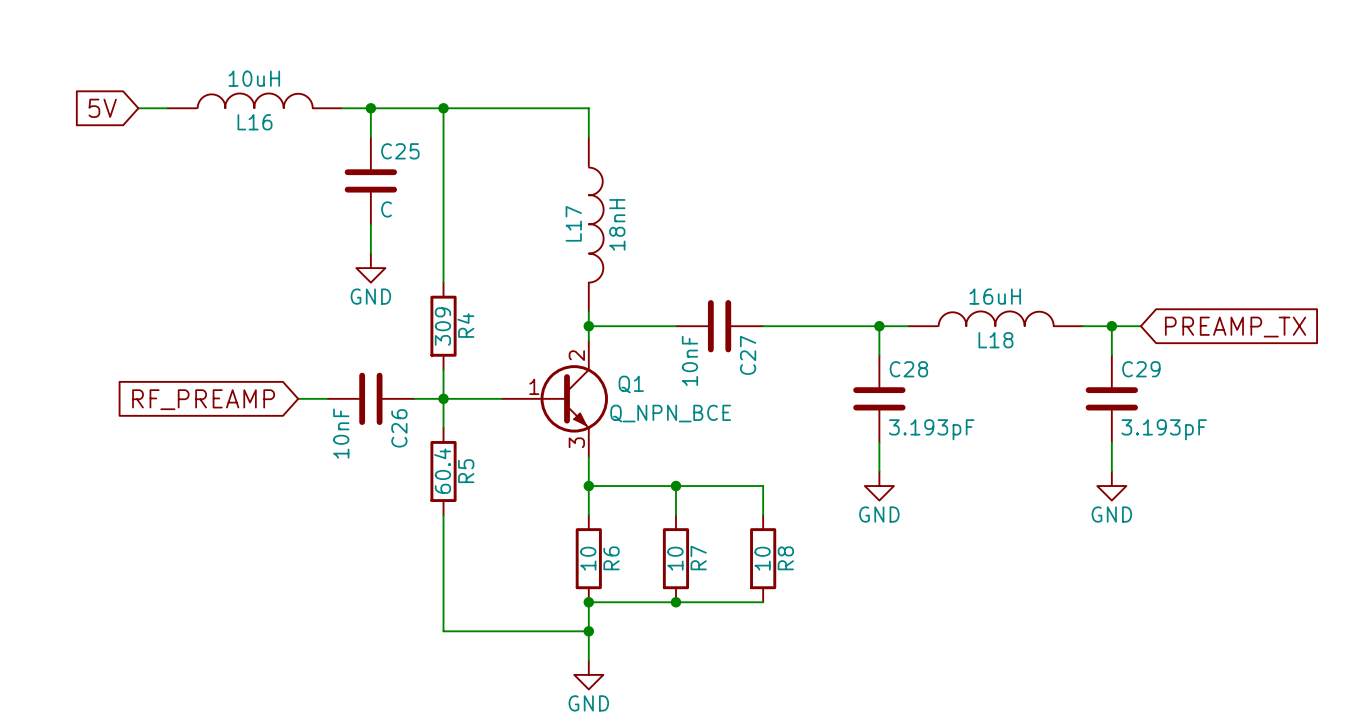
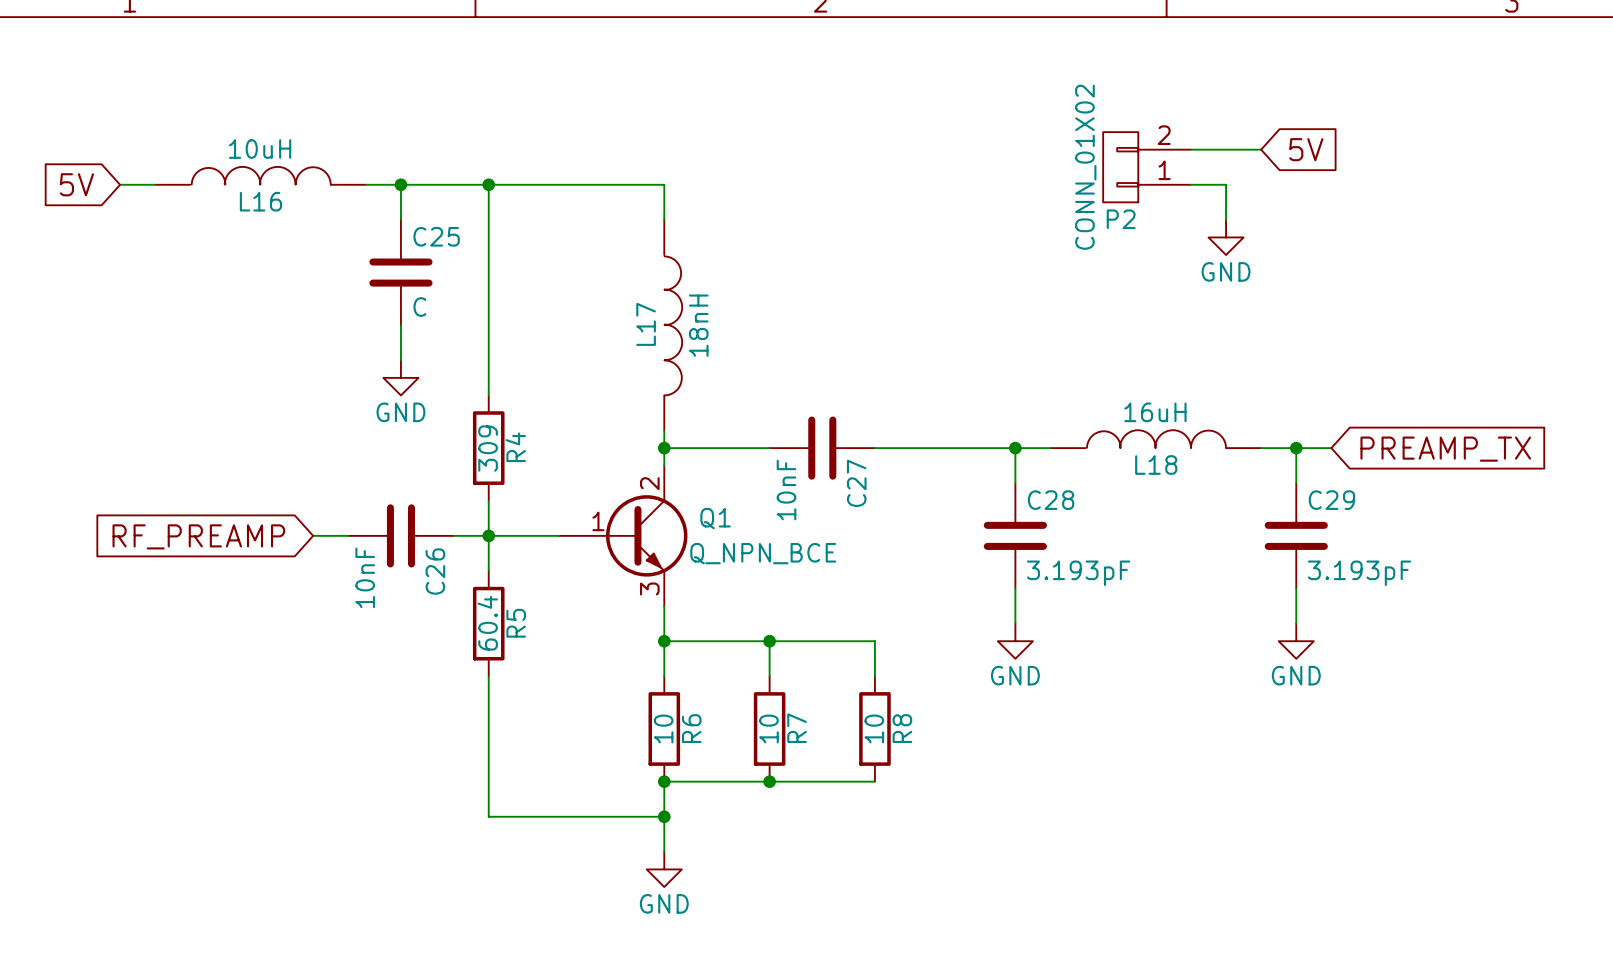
wire: none -> (1190, 149) (1261, 149)
global label: none -> 5V (1306, 149)
P2: none -> CONN_01X02 (1147, 167)
wire: none -> (1190, 184) (1226, 184) (1226, 219)
power symbol: none -> GND (1226, 237)

